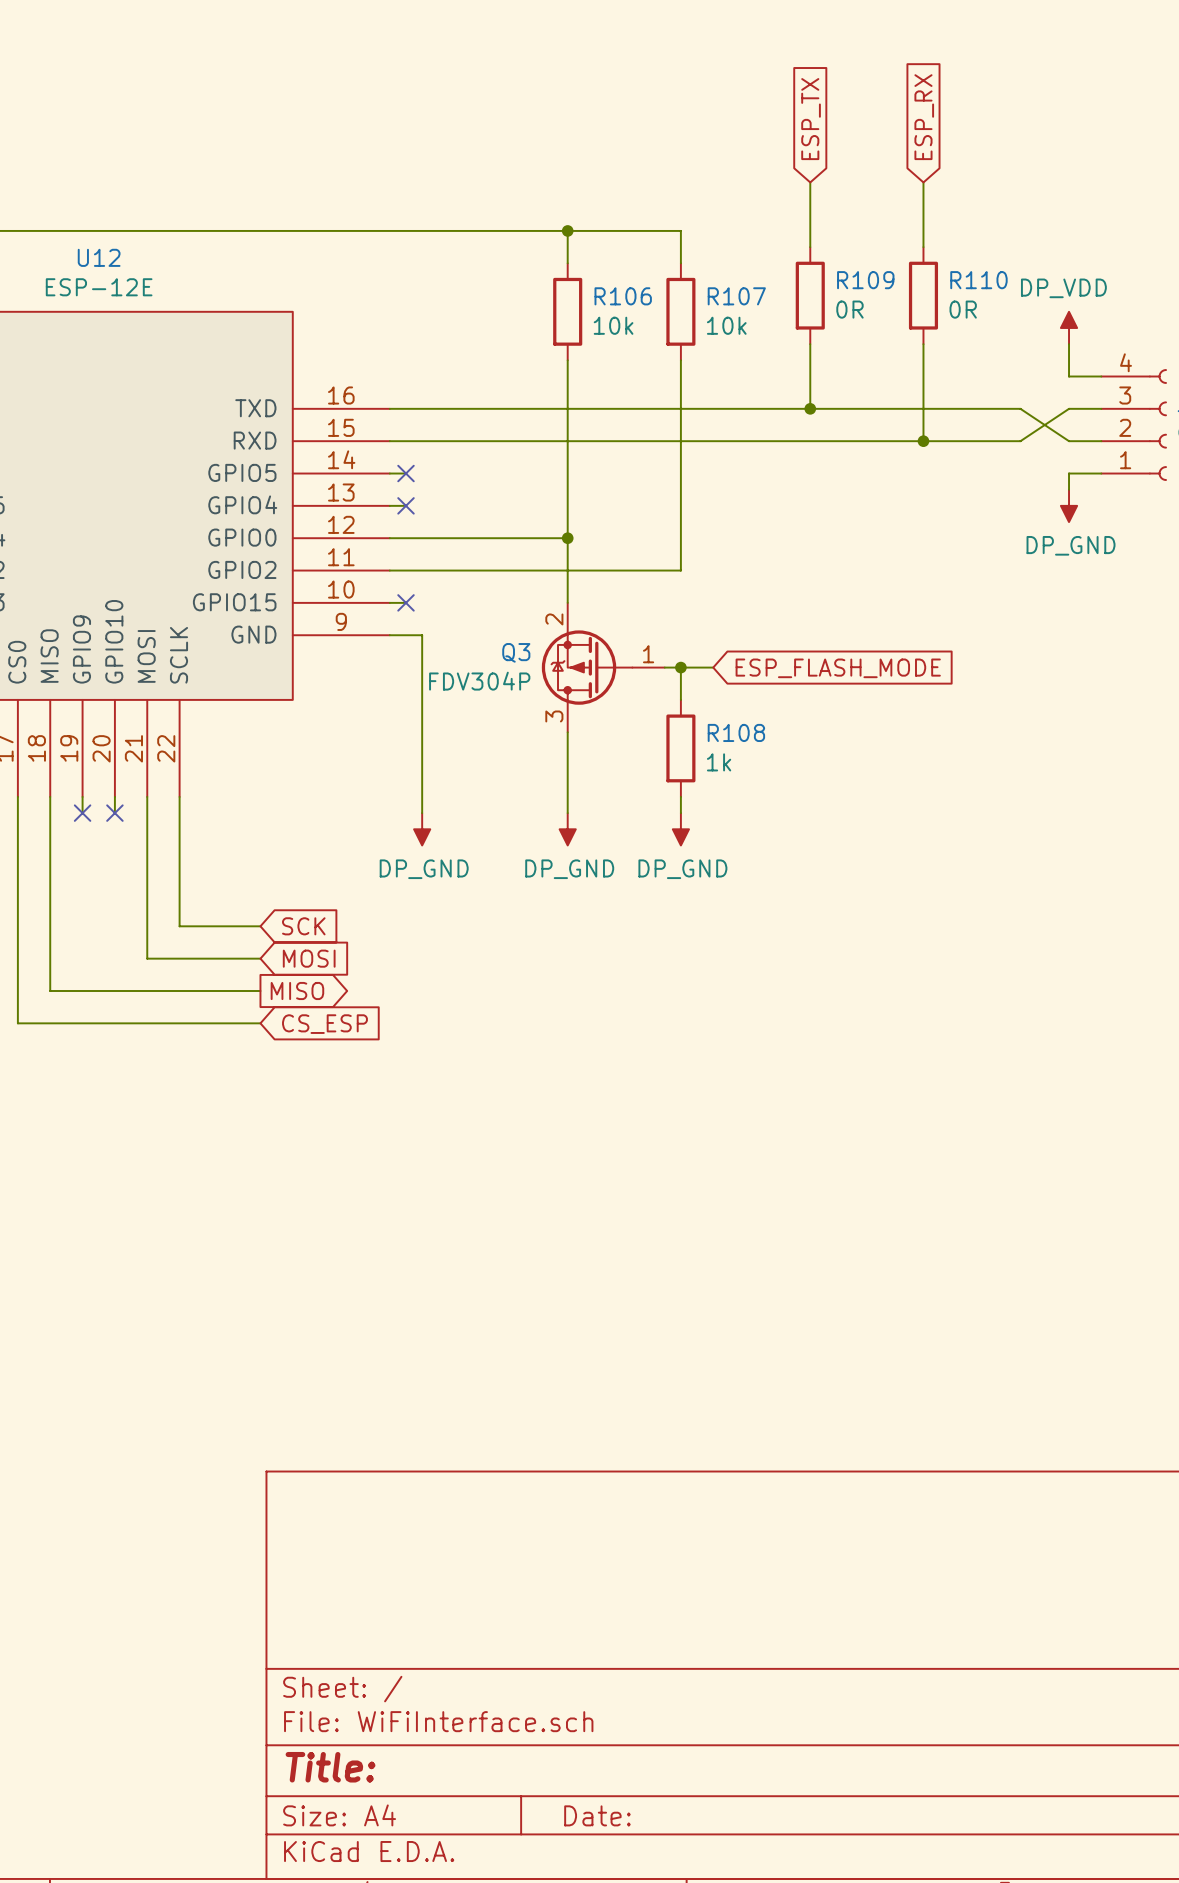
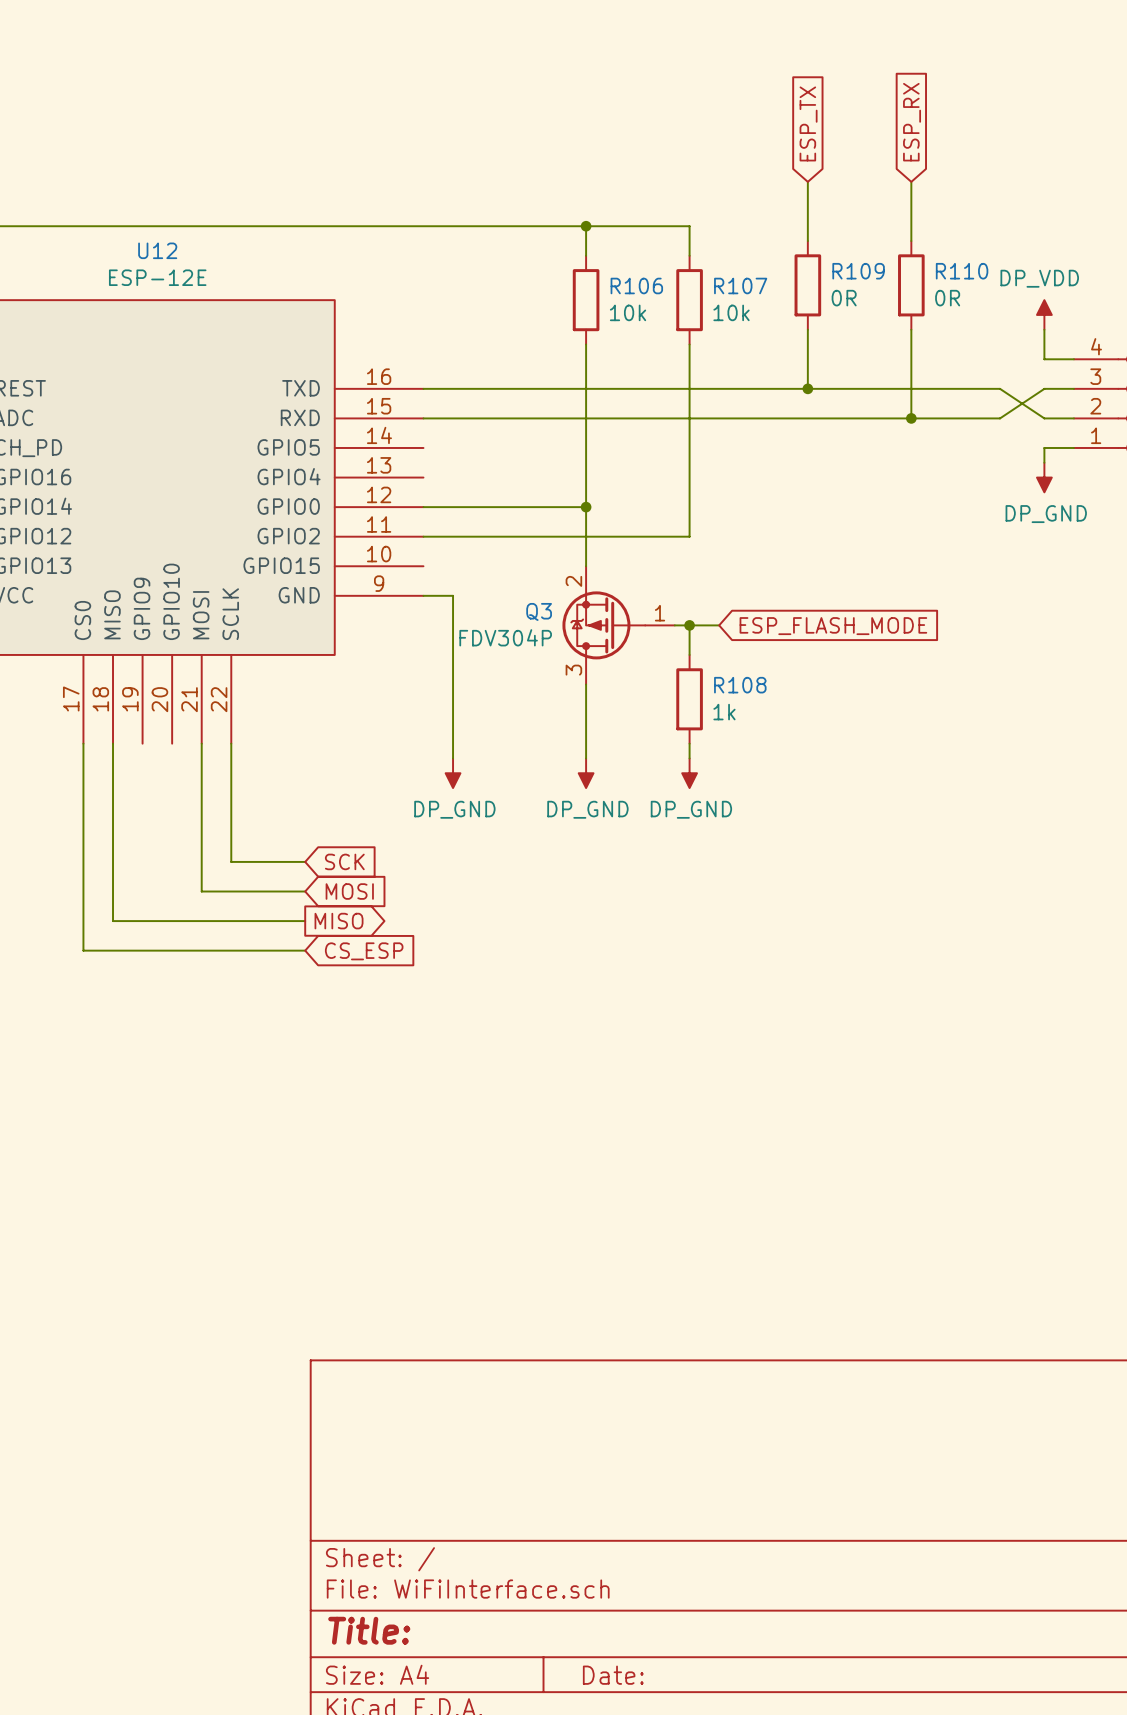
wire: (389, 473) (405, 473) -> none
no-connect mark: (405, 473) -> none
wire: (389, 505) (405, 505) -> none
no-connect mark: (405, 505) -> none
wire: (389, 602) (405, 602) -> none
no-connect mark: (405, 602) -> none
wire: (82, 796) (82, 813) -> none
wire: (114, 796) (114, 813) -> none
no-connect mark: (82, 813) -> none
no-connect mark: (114, 813) -> none

